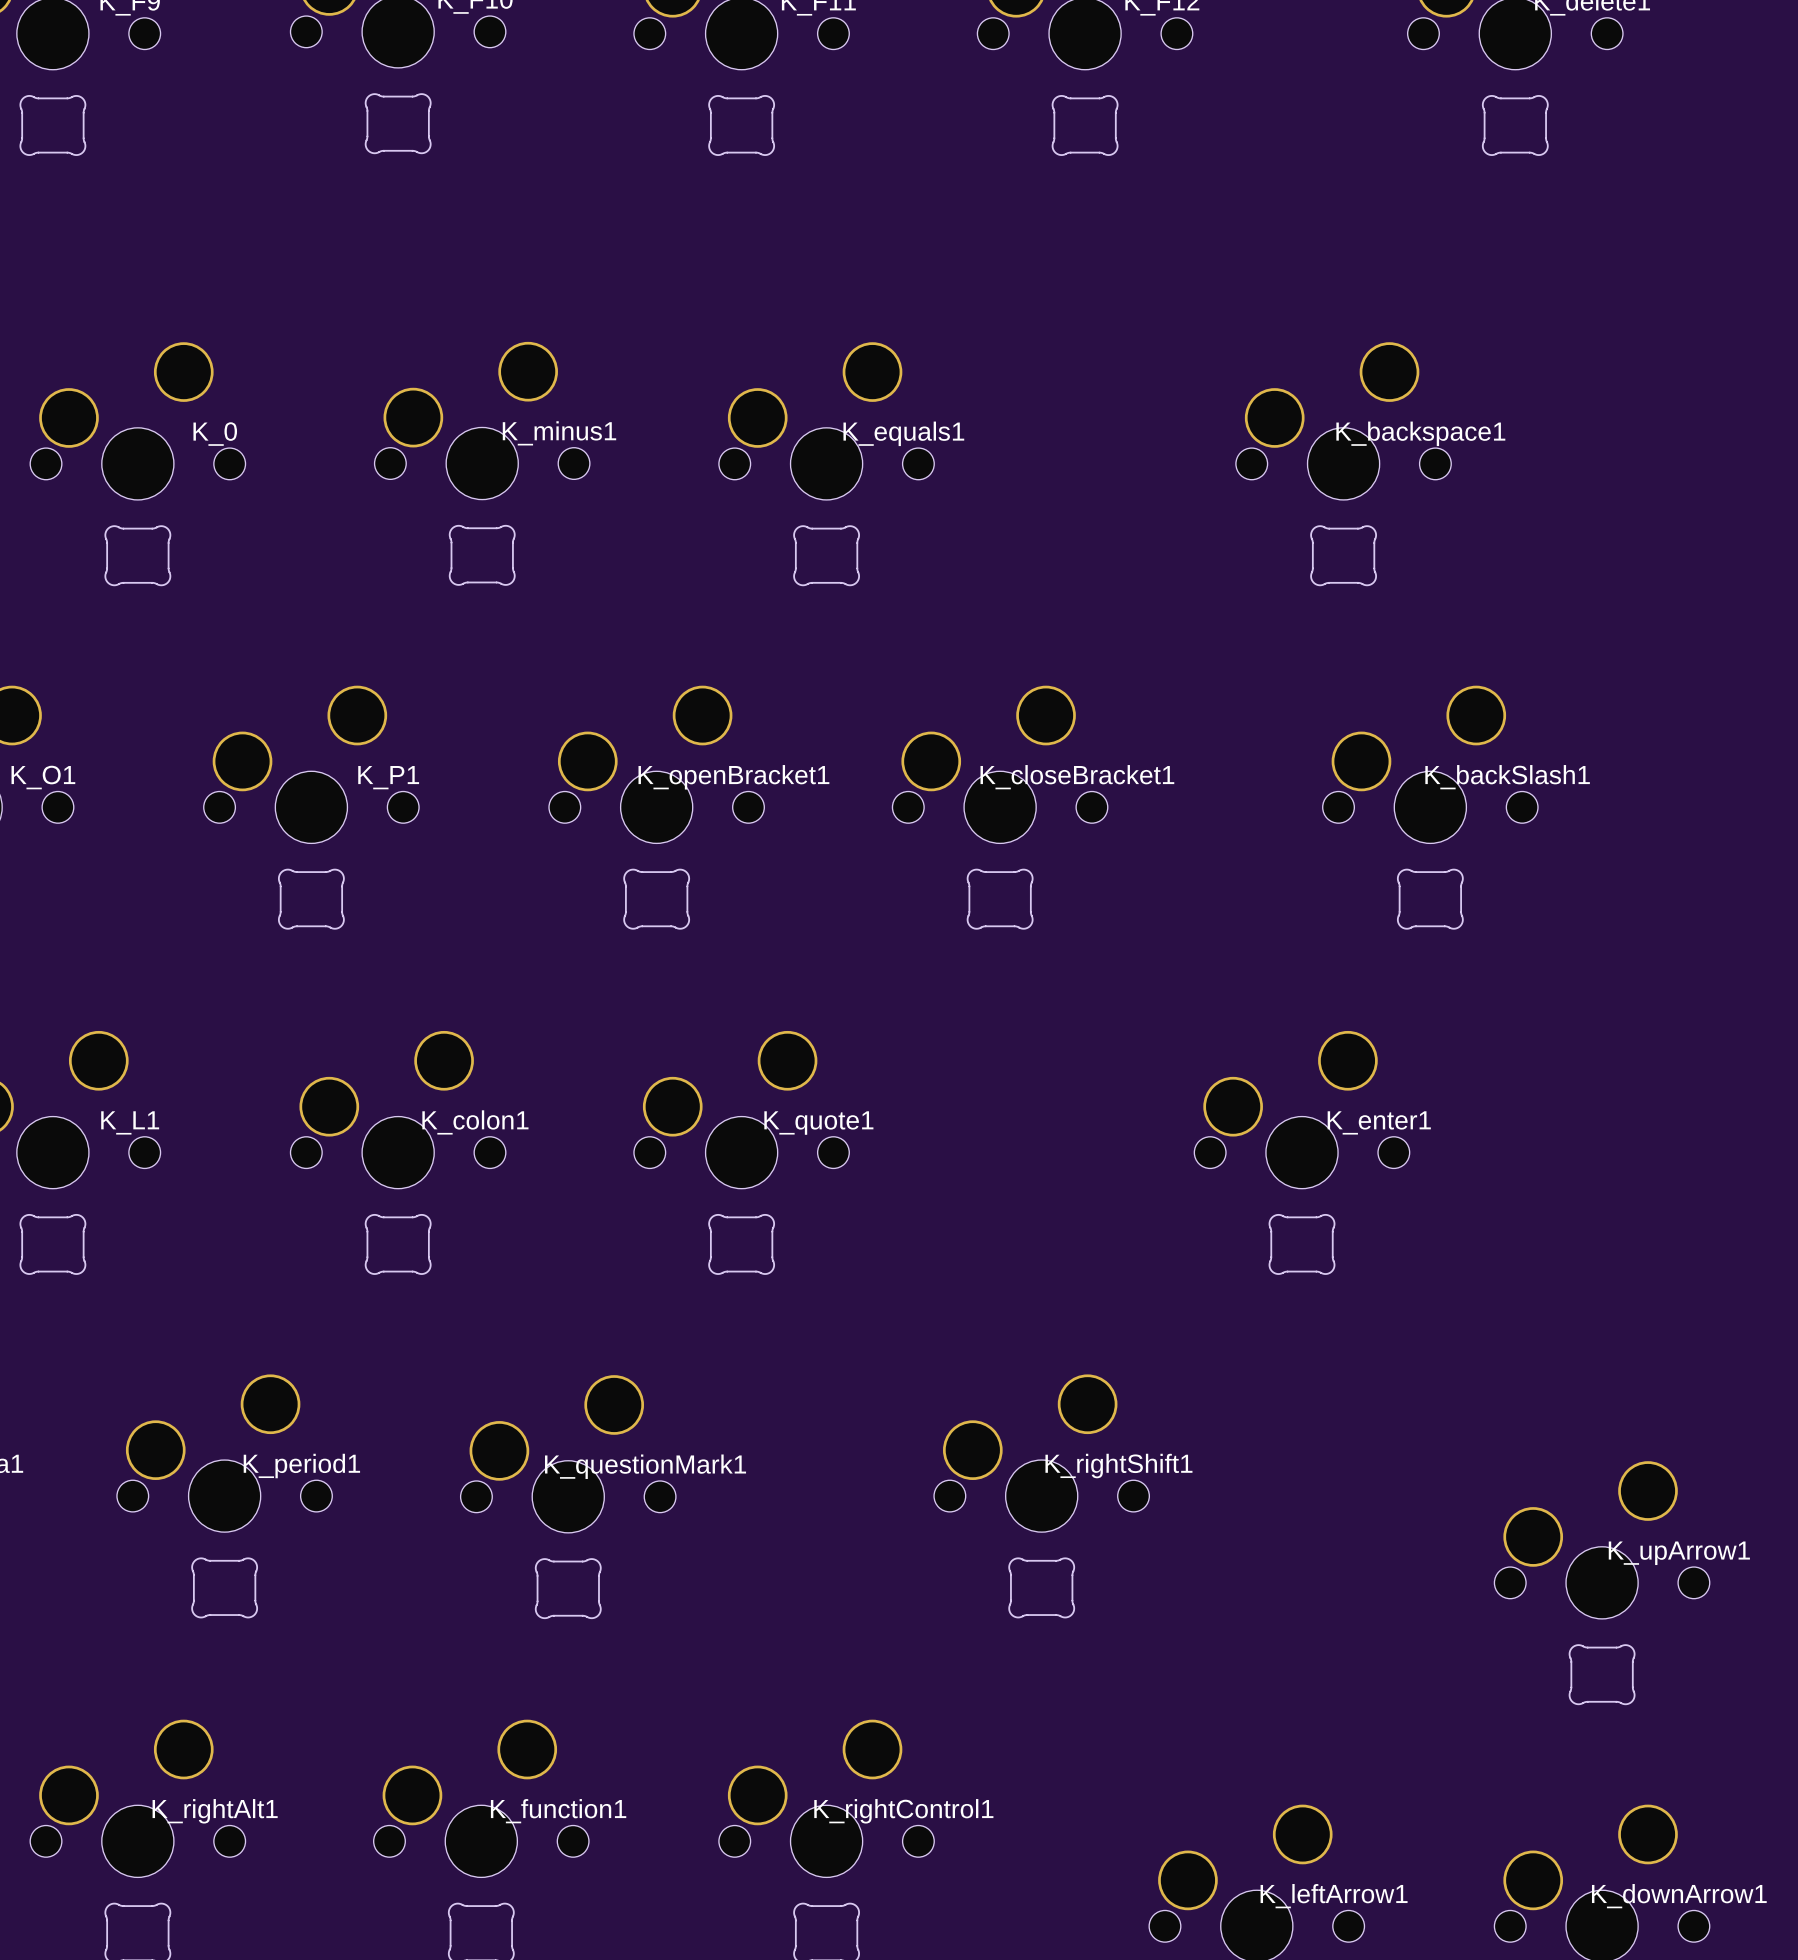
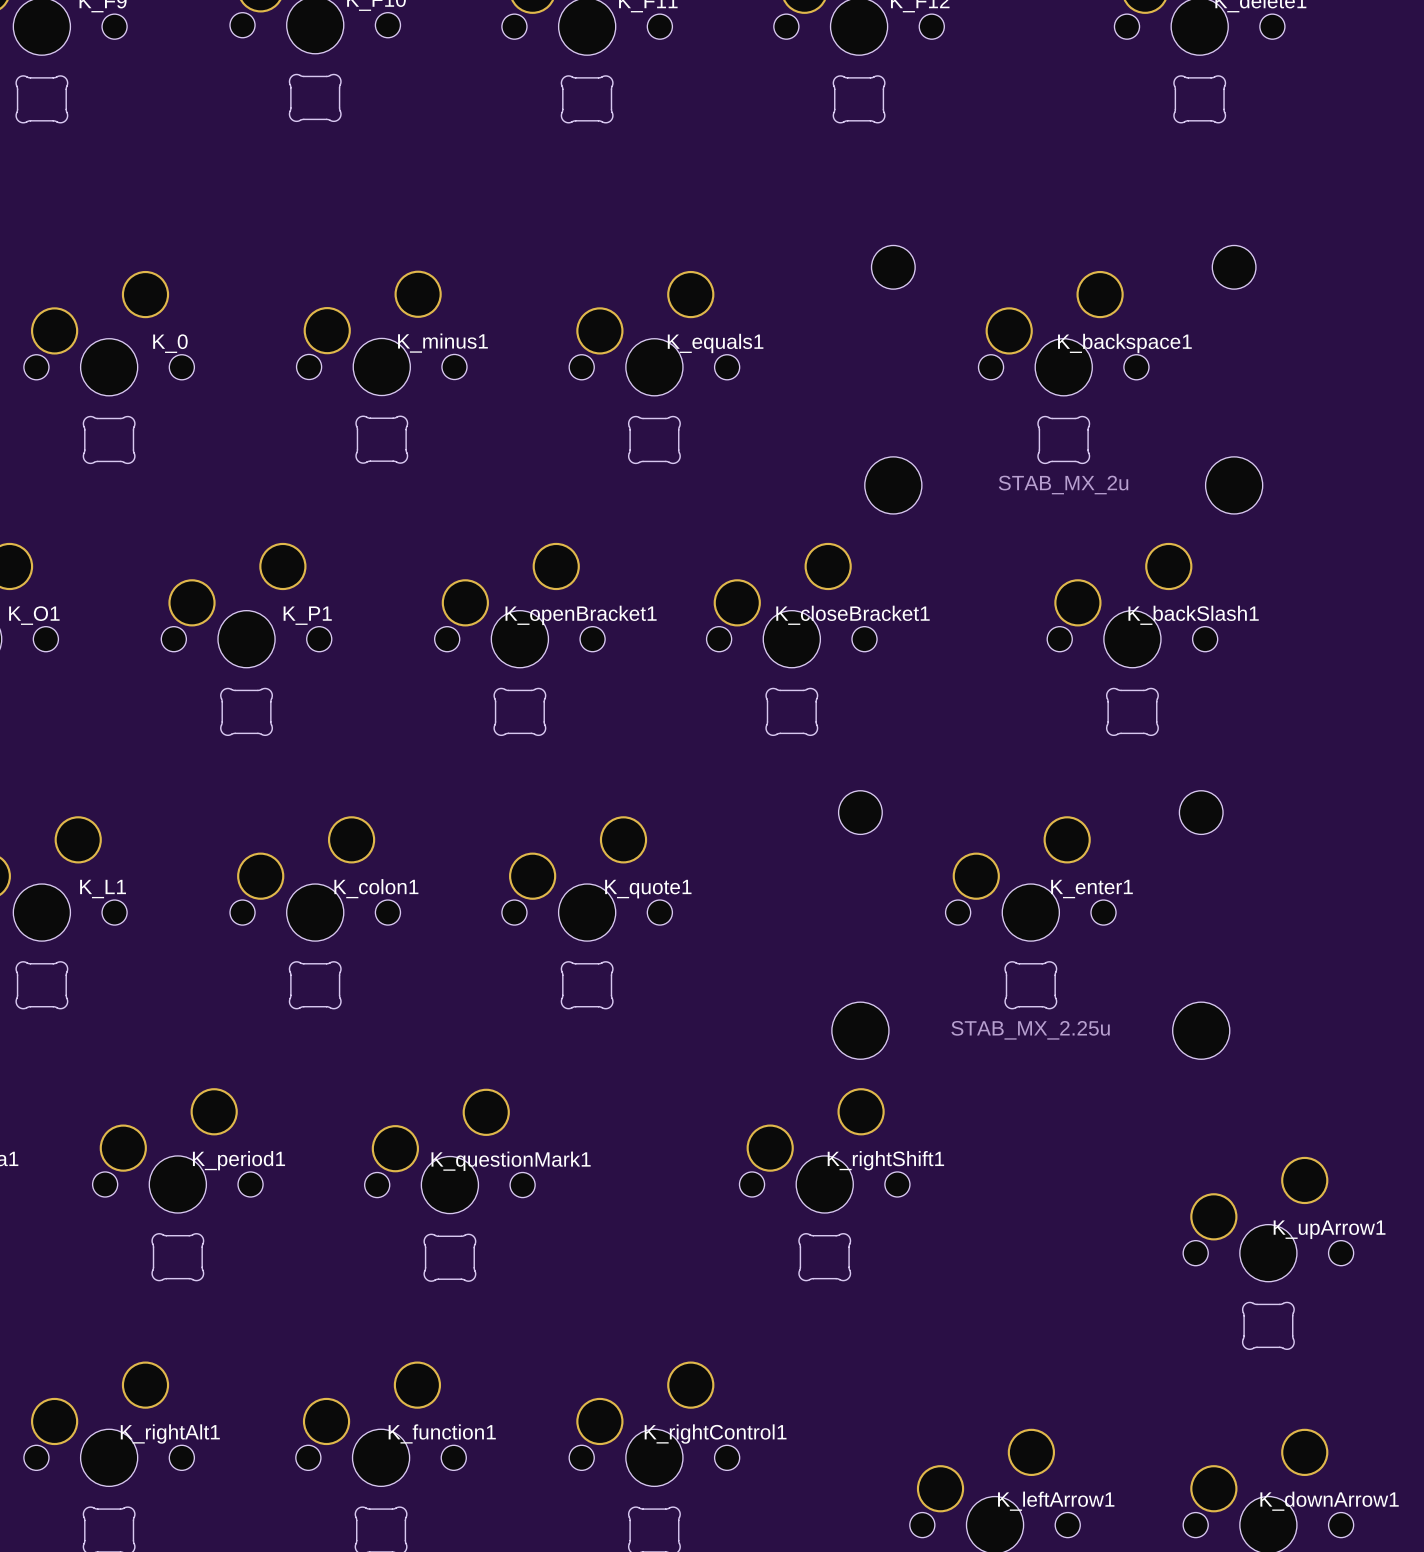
part: none -> STAB_MX_2u (1063, 379)
part: none -> STAB_MX_2.25u (1030, 925)

